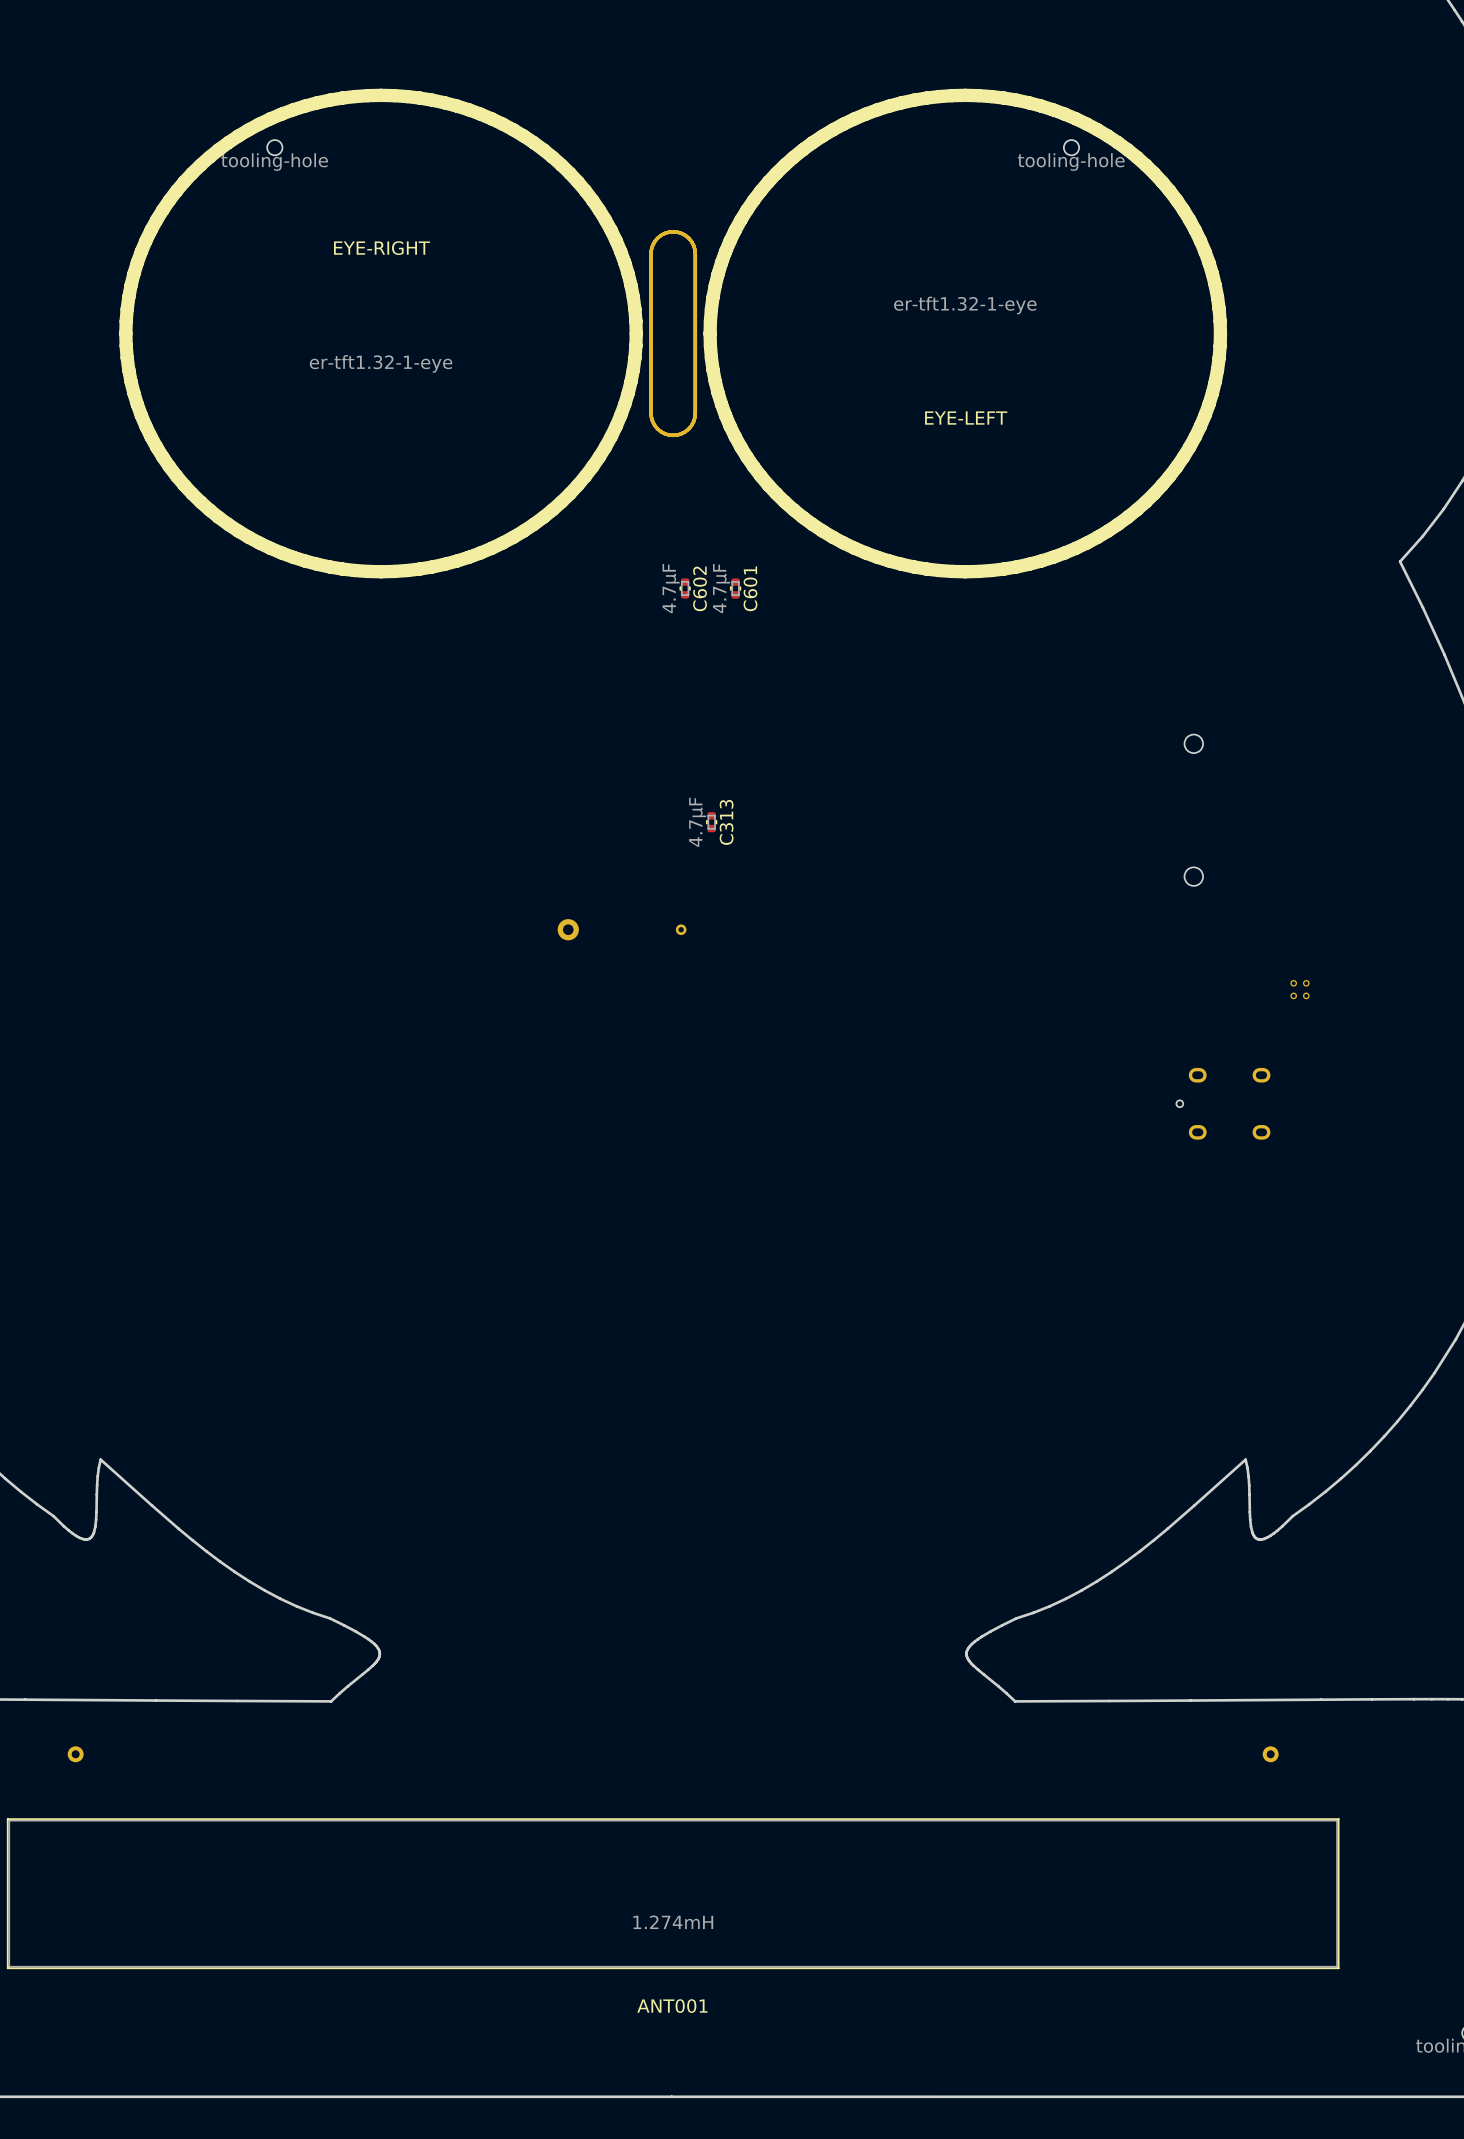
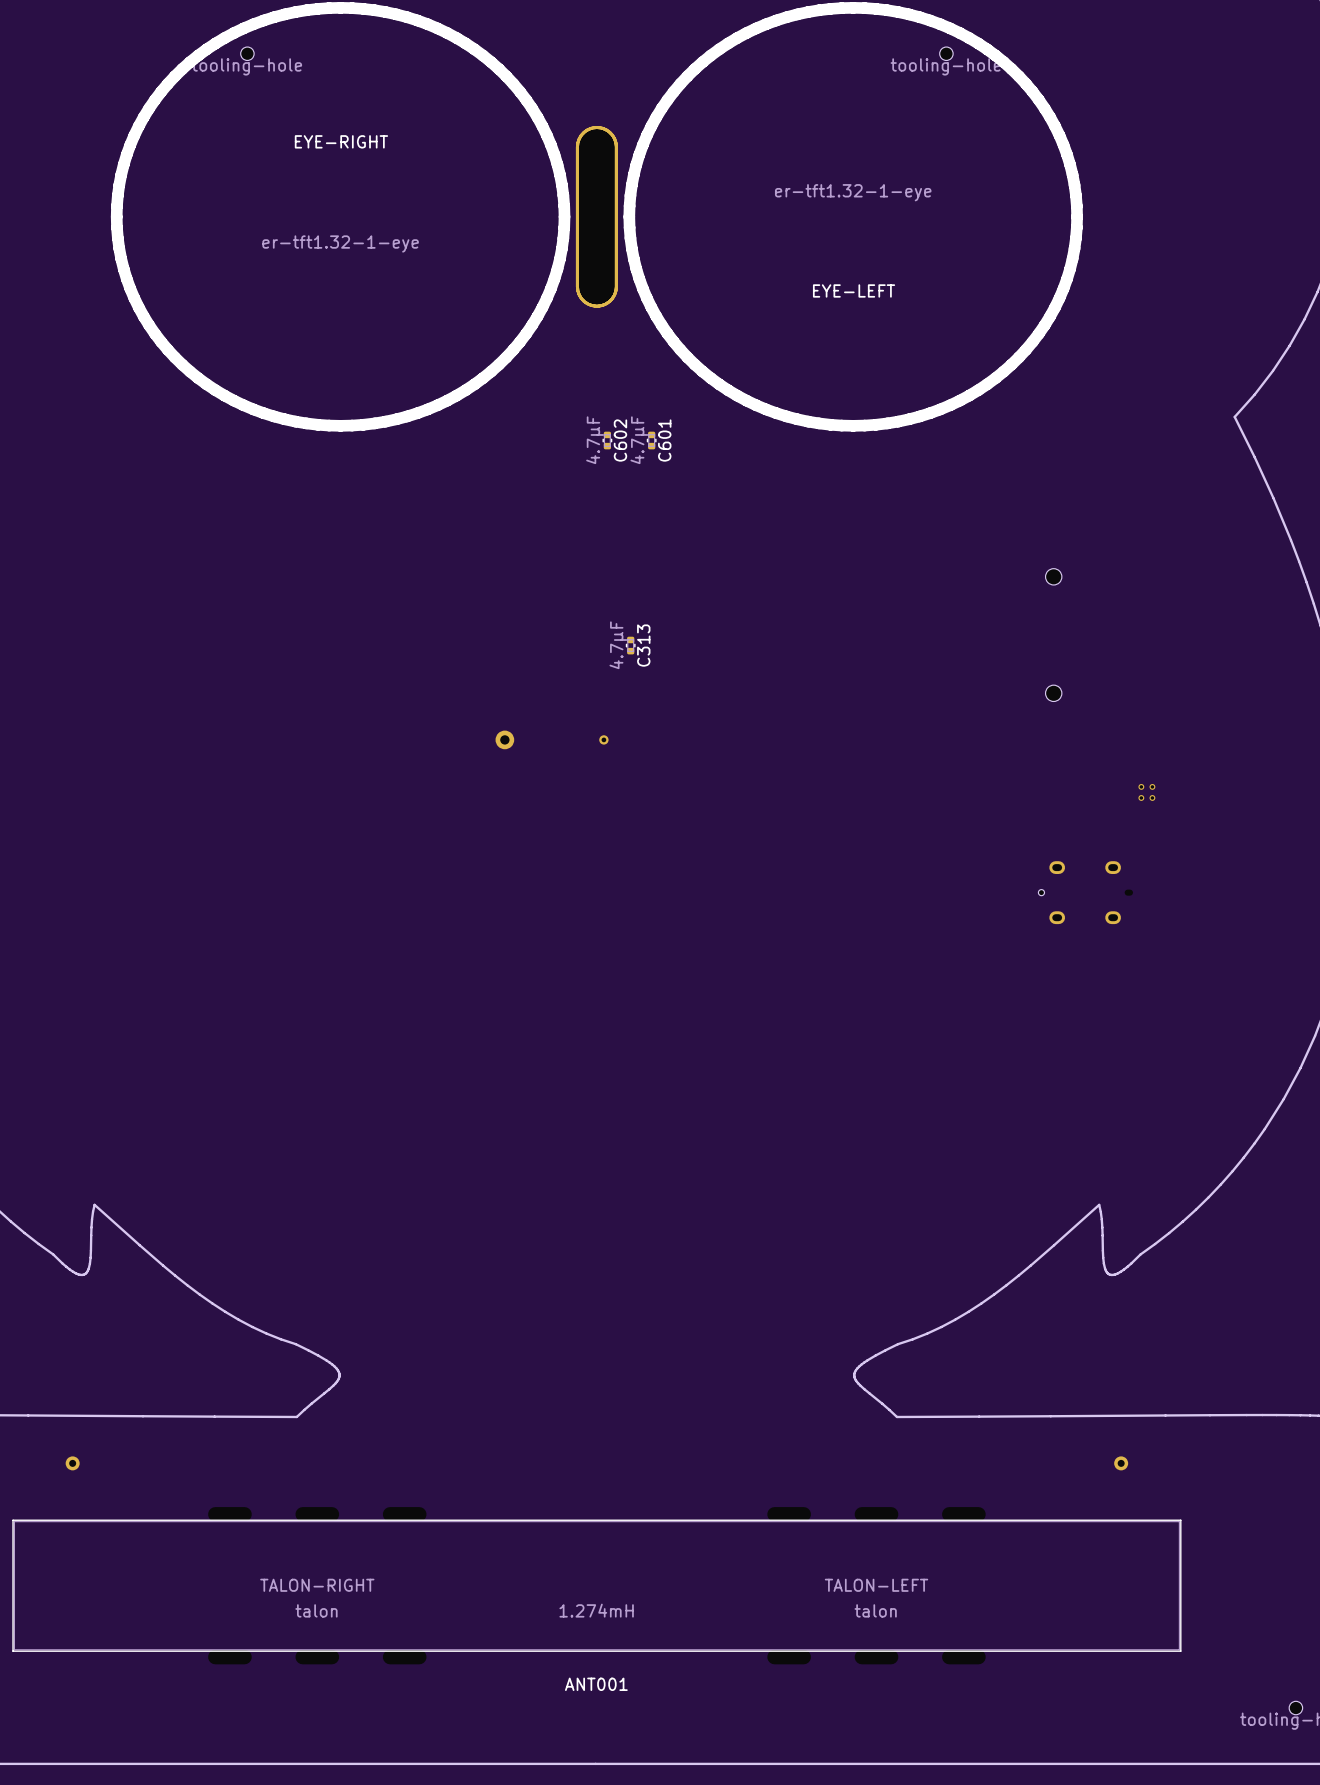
TALON-RIGHT: none -> talon (317, 1585)
TALON-LEFT: none -> talon (876, 1585)

